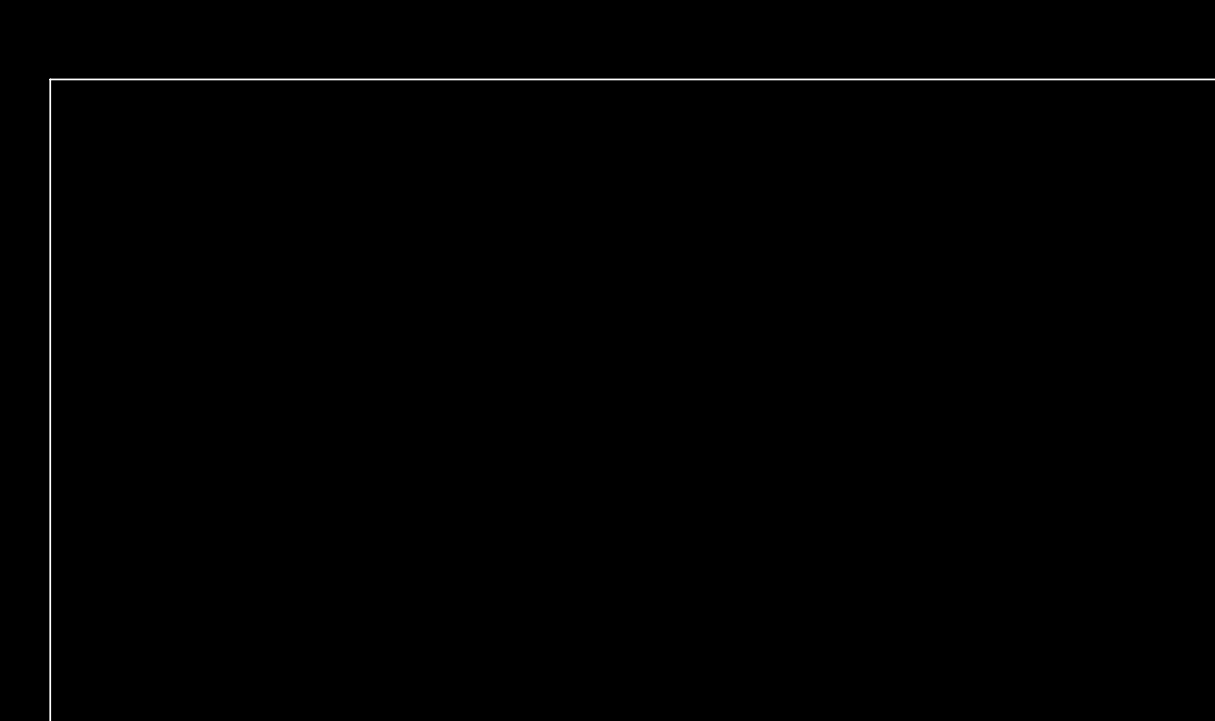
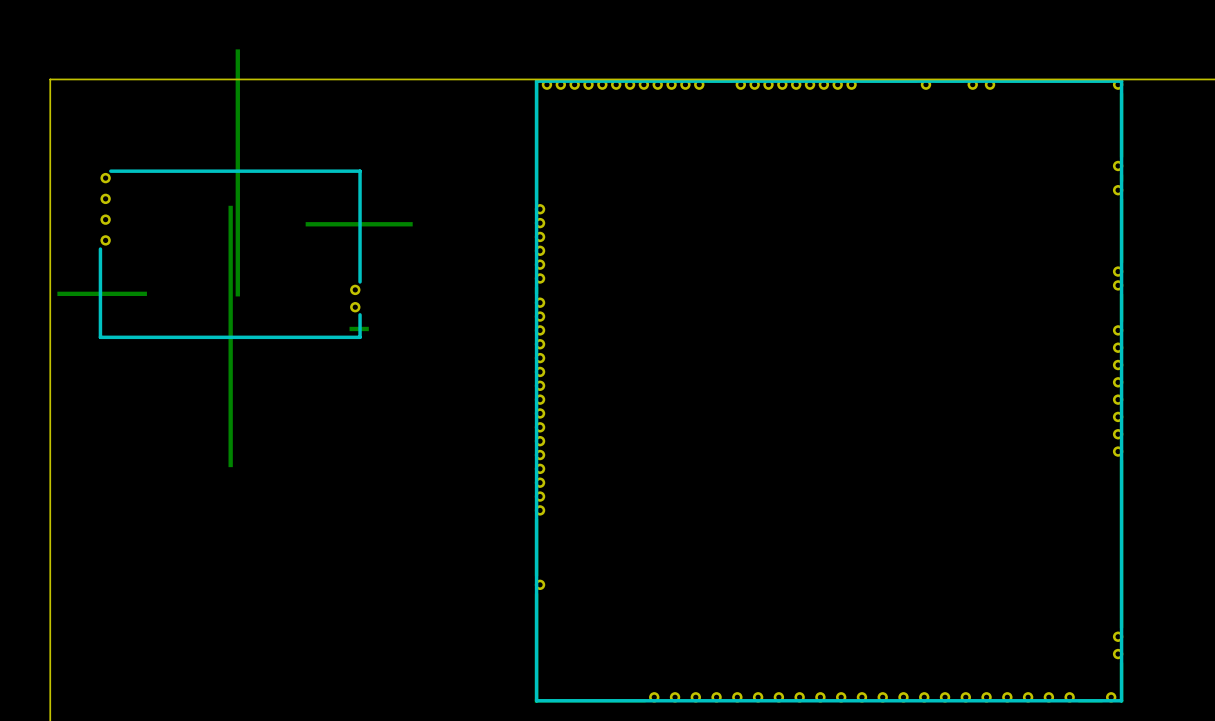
part: none -> (235, 258)
part: none -> (829, 390)

